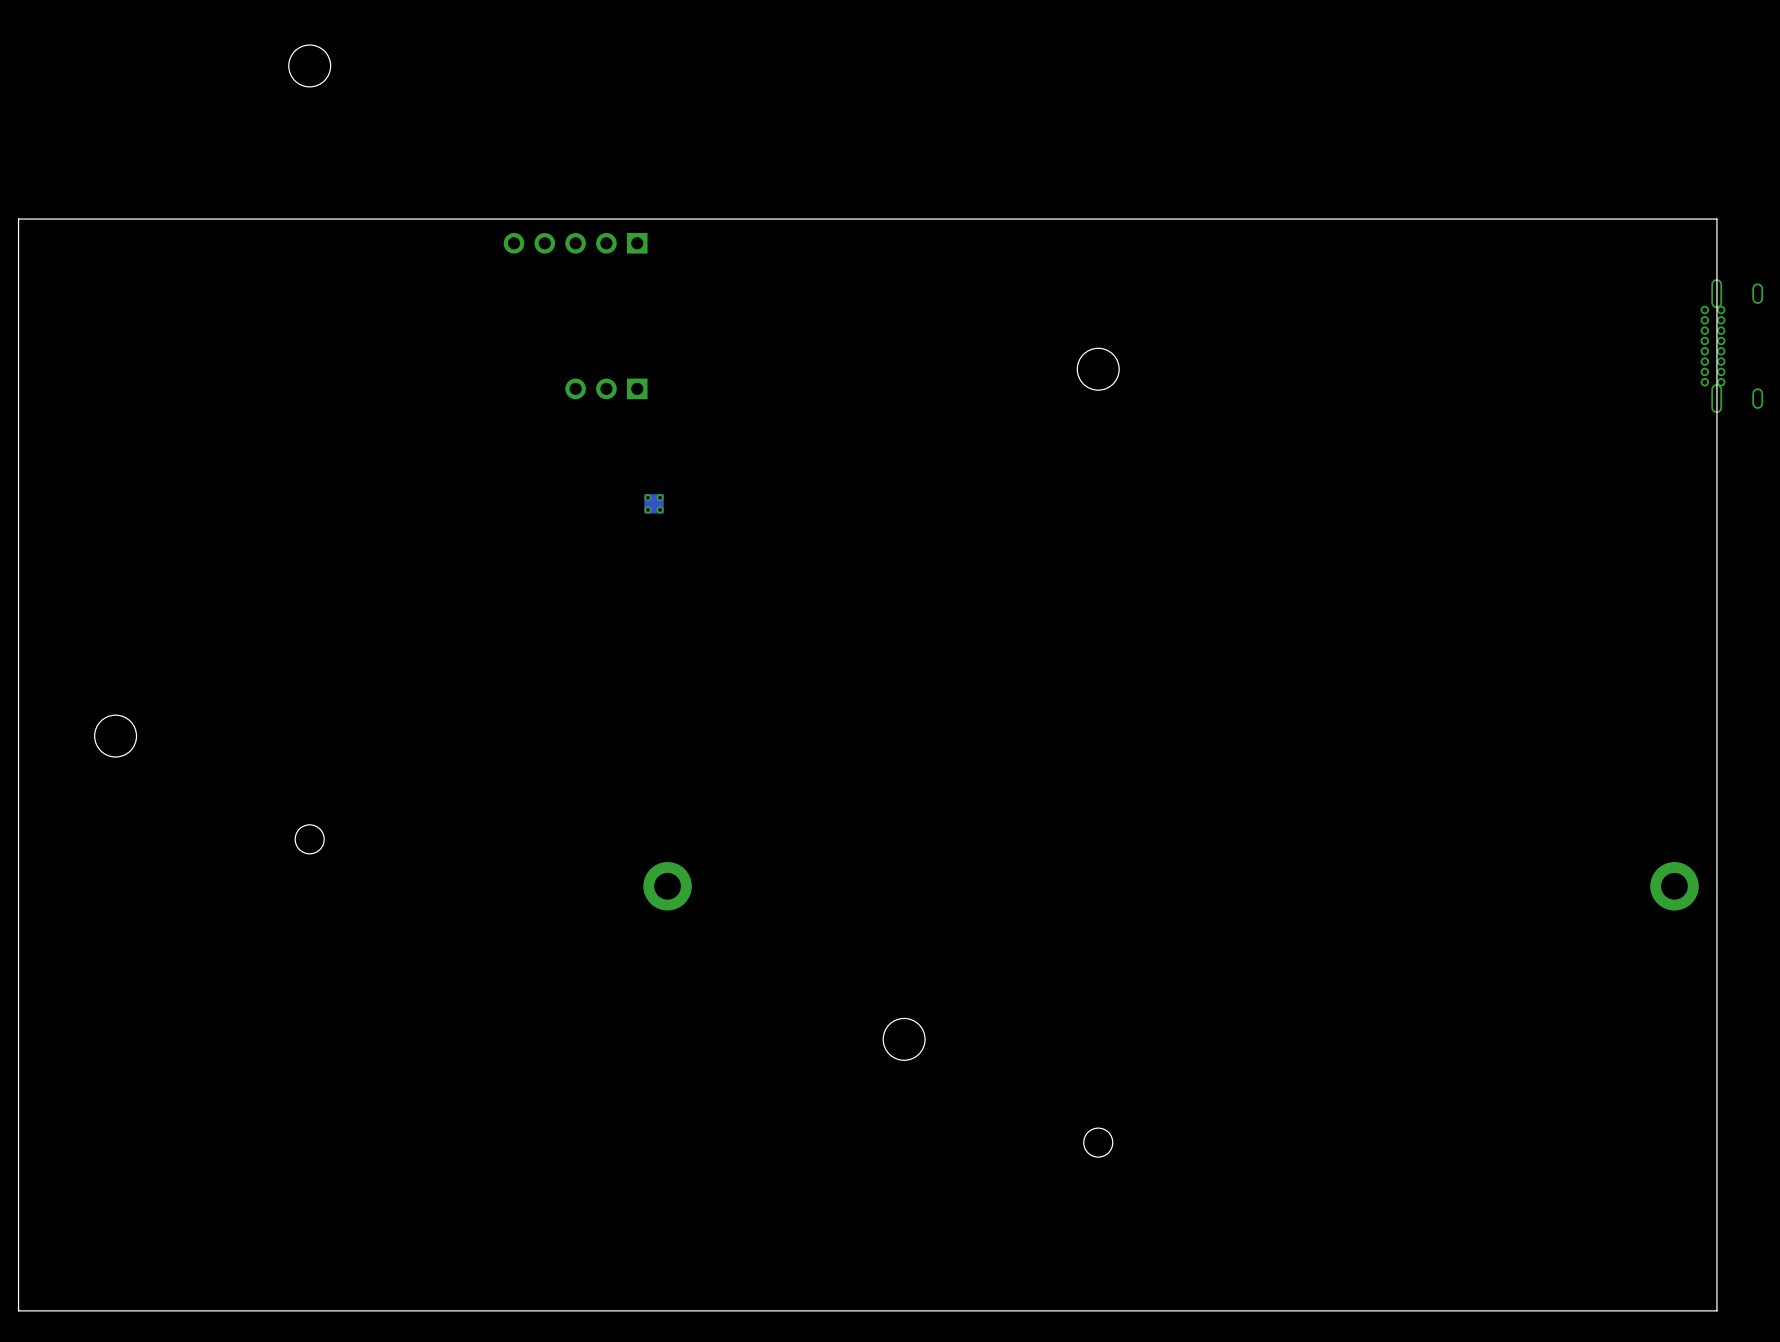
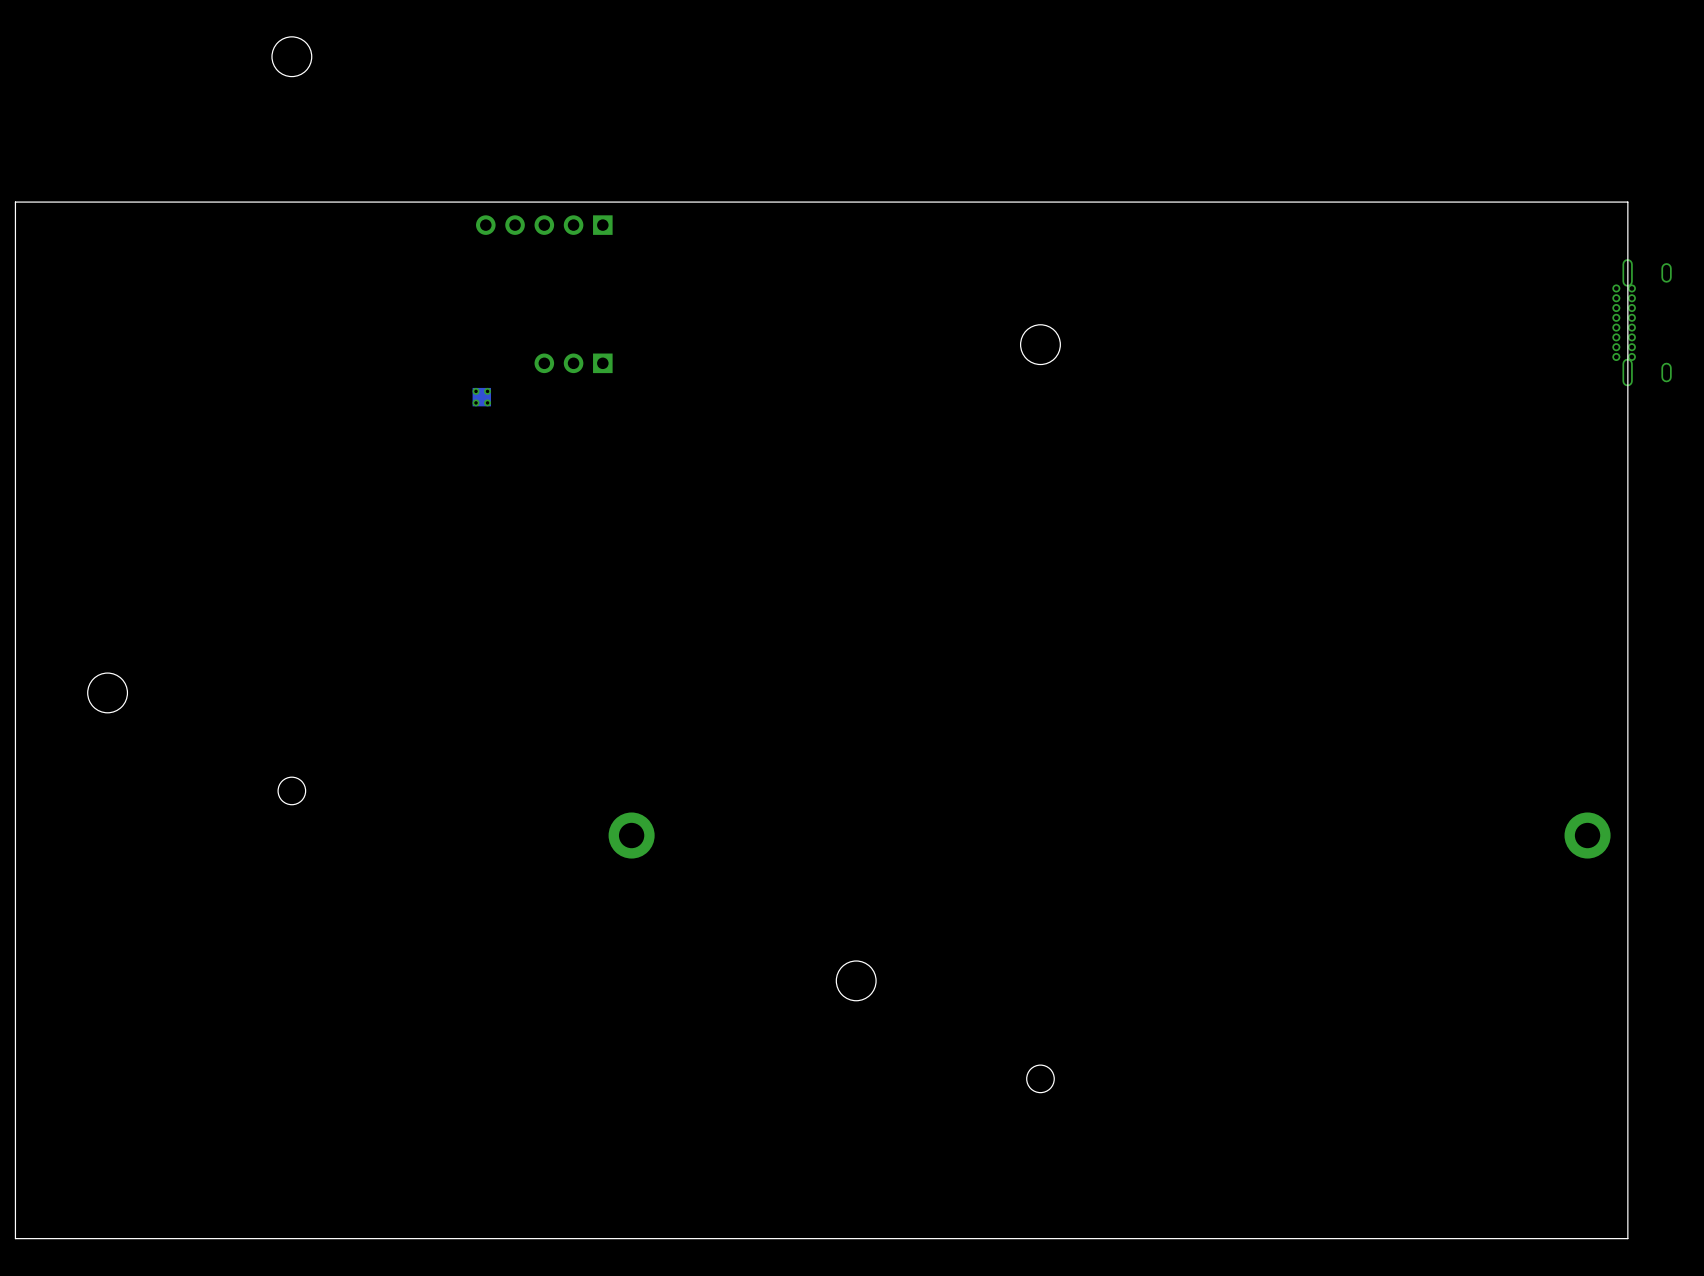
part position: (654, 503) -> (481, 397)

